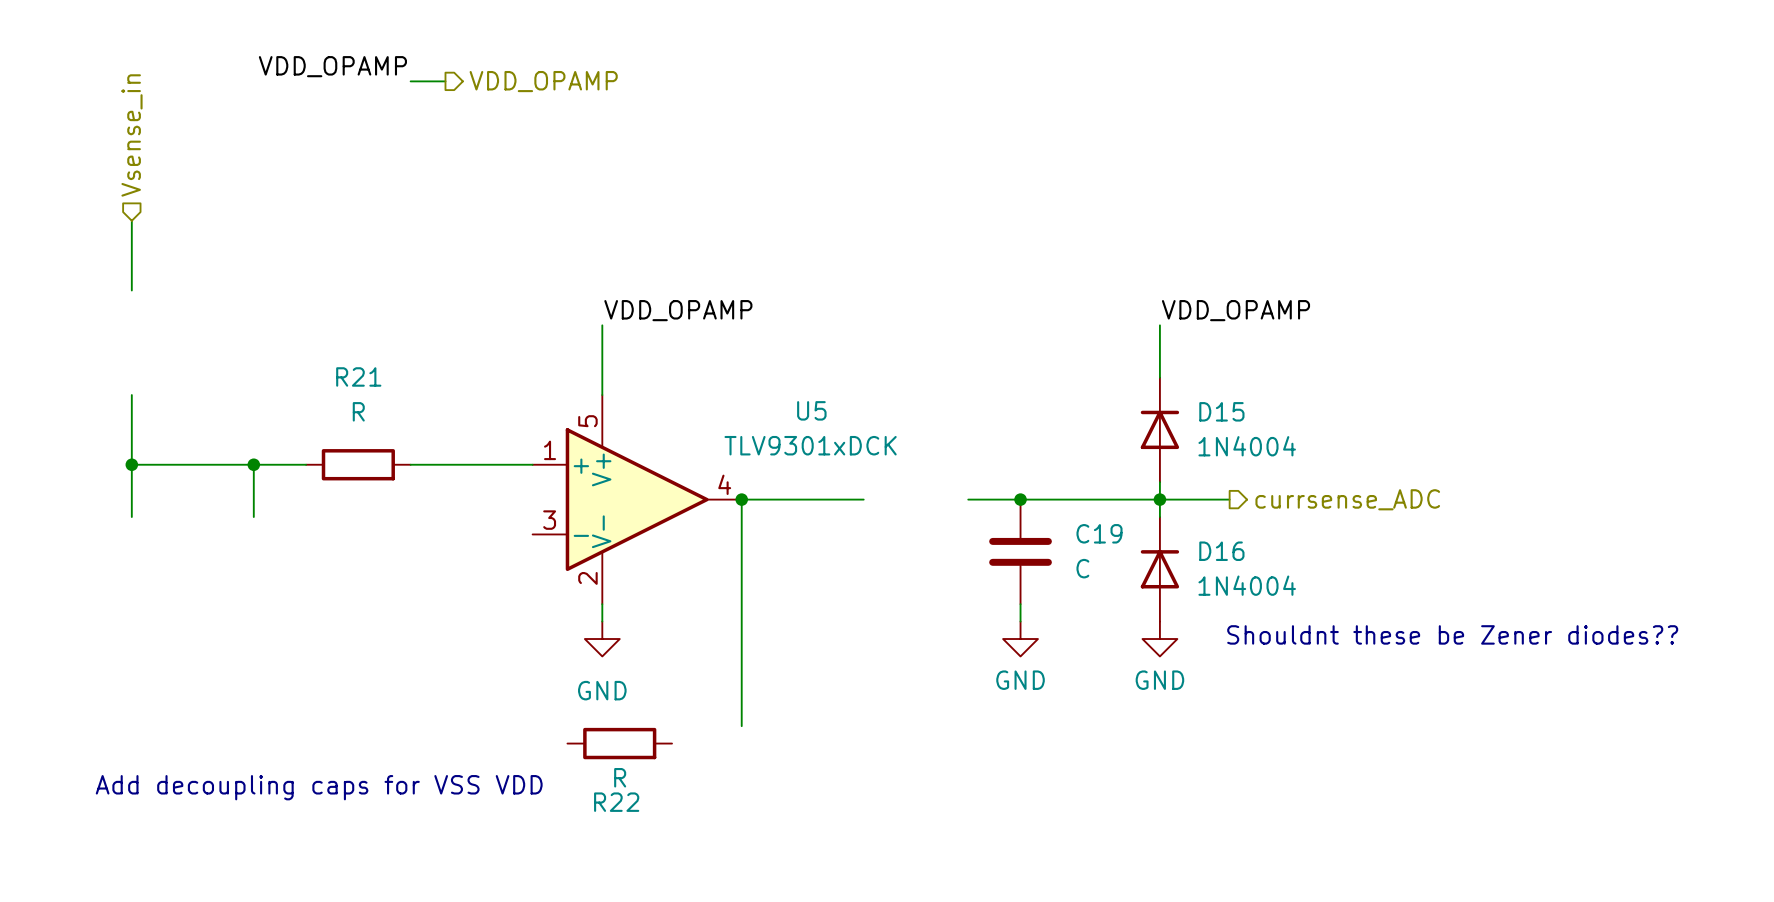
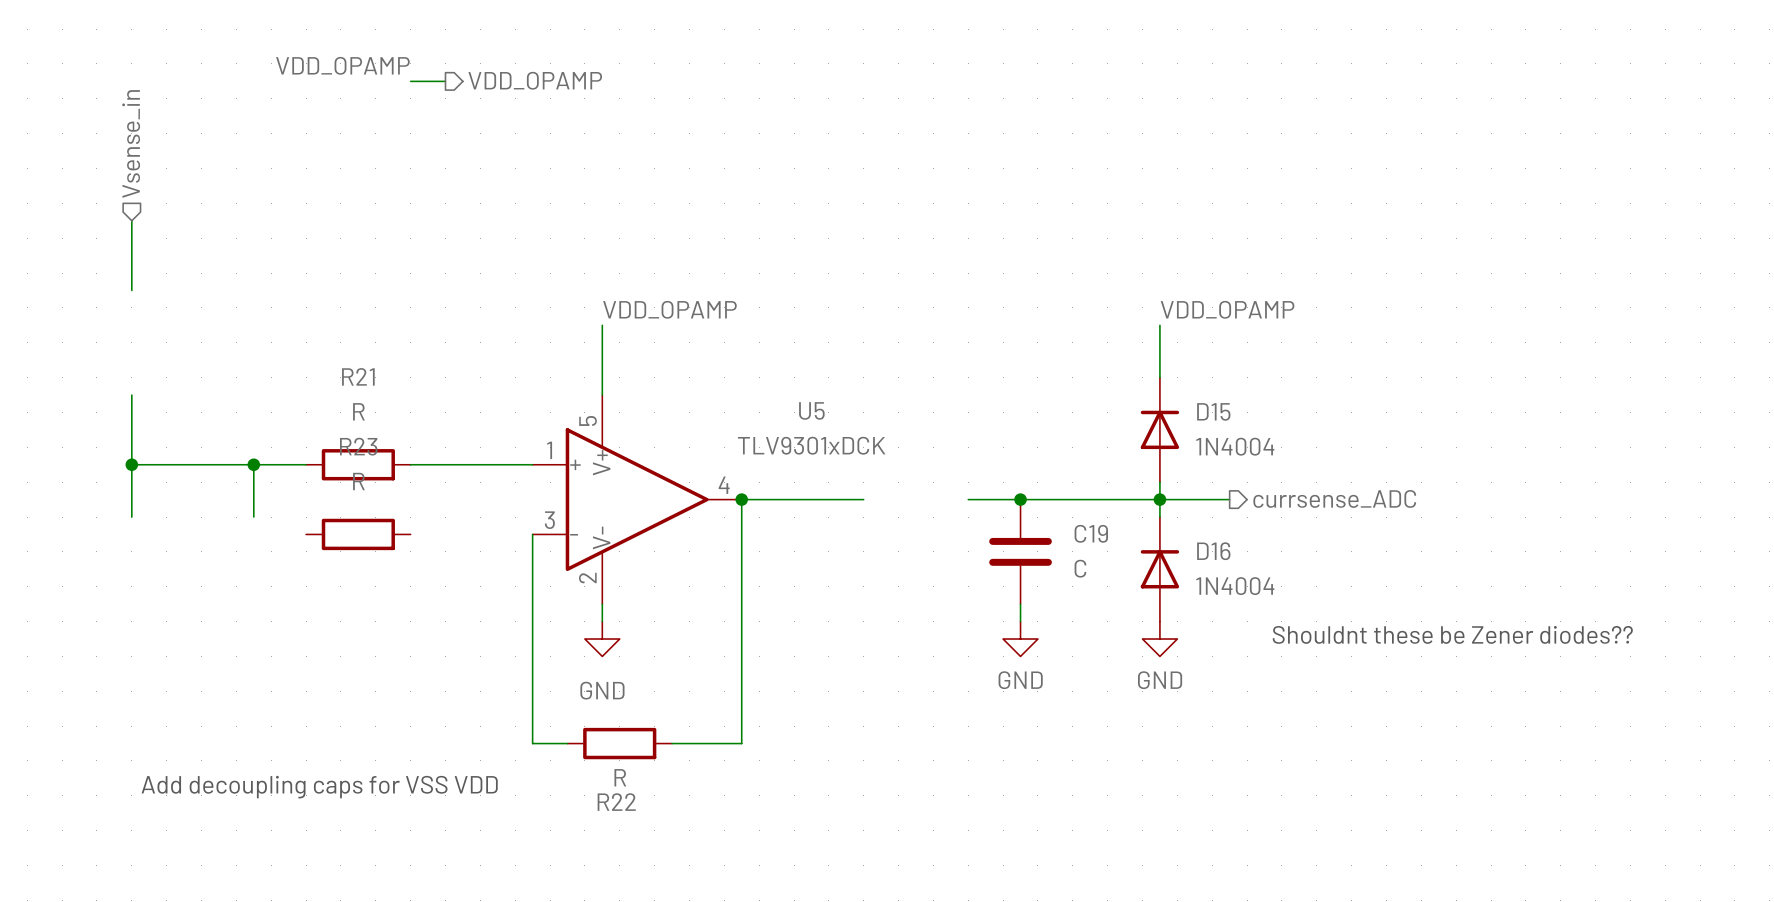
R23: none -> R (358, 534)
wire: none -> (532, 534) (532, 743) (567, 743)
wire: none -> (741, 726) (741, 743) (672, 743)

